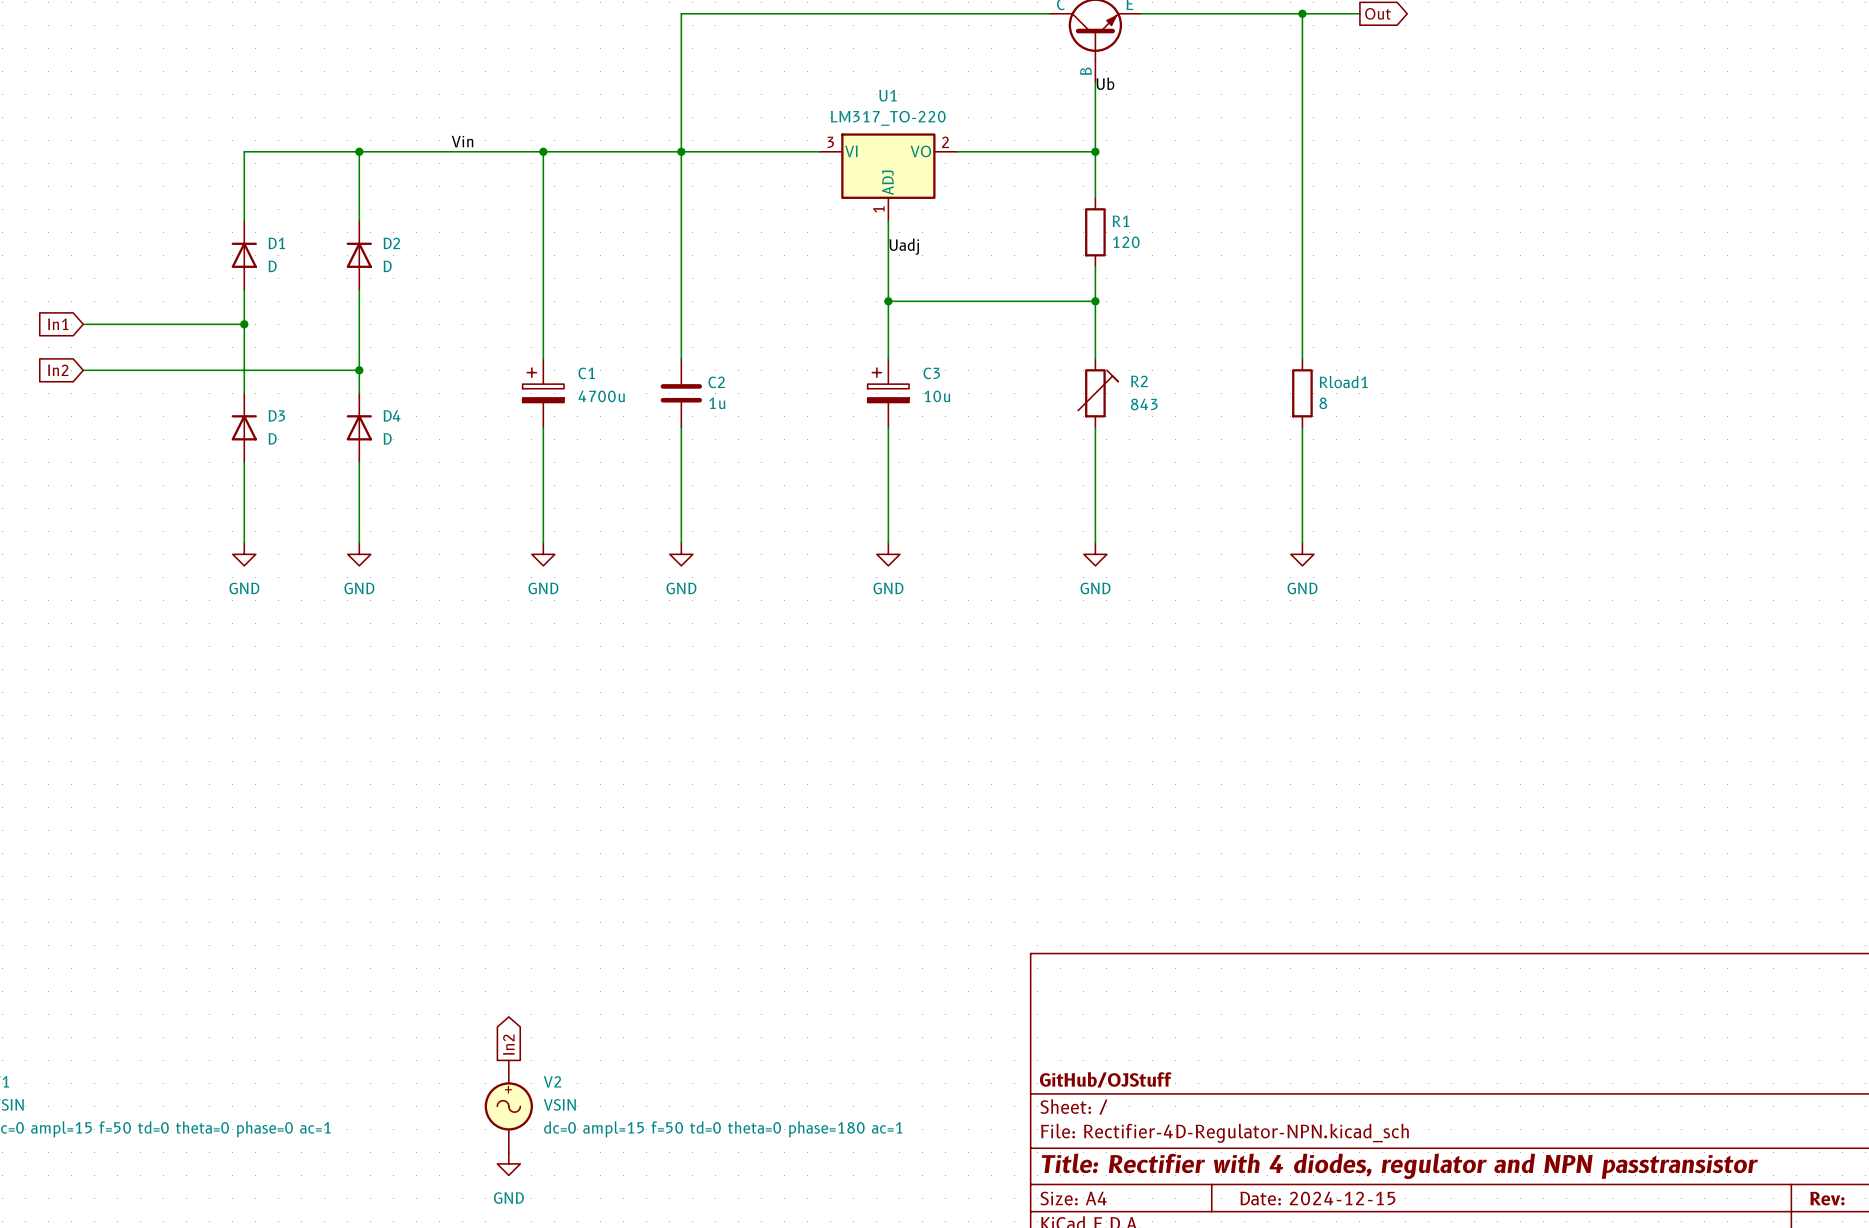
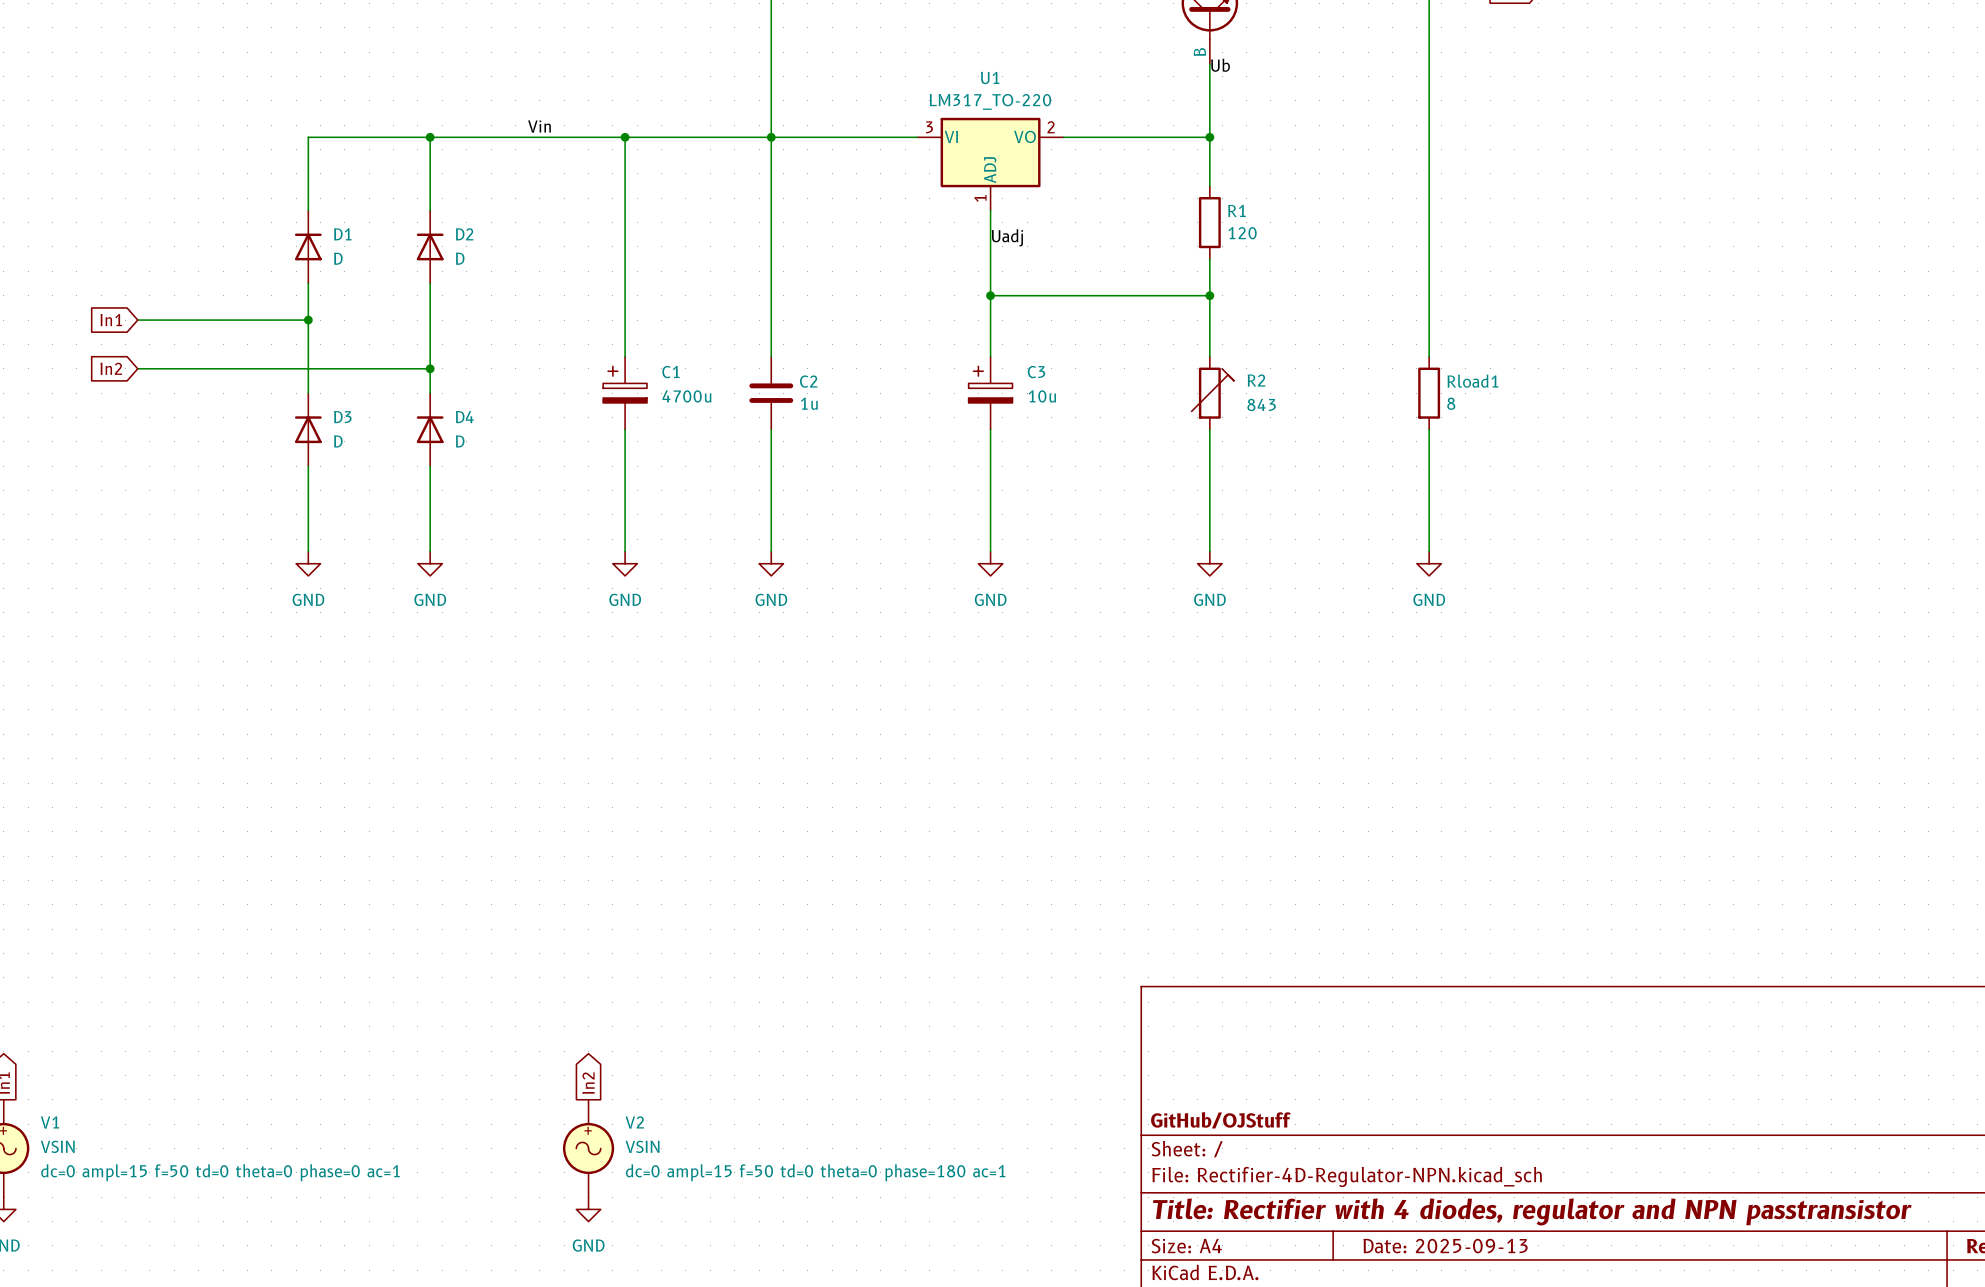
title block: Date: 2024-12-15 (1317, 1198) -> Date: 2025-09-13 (1445, 1246)

